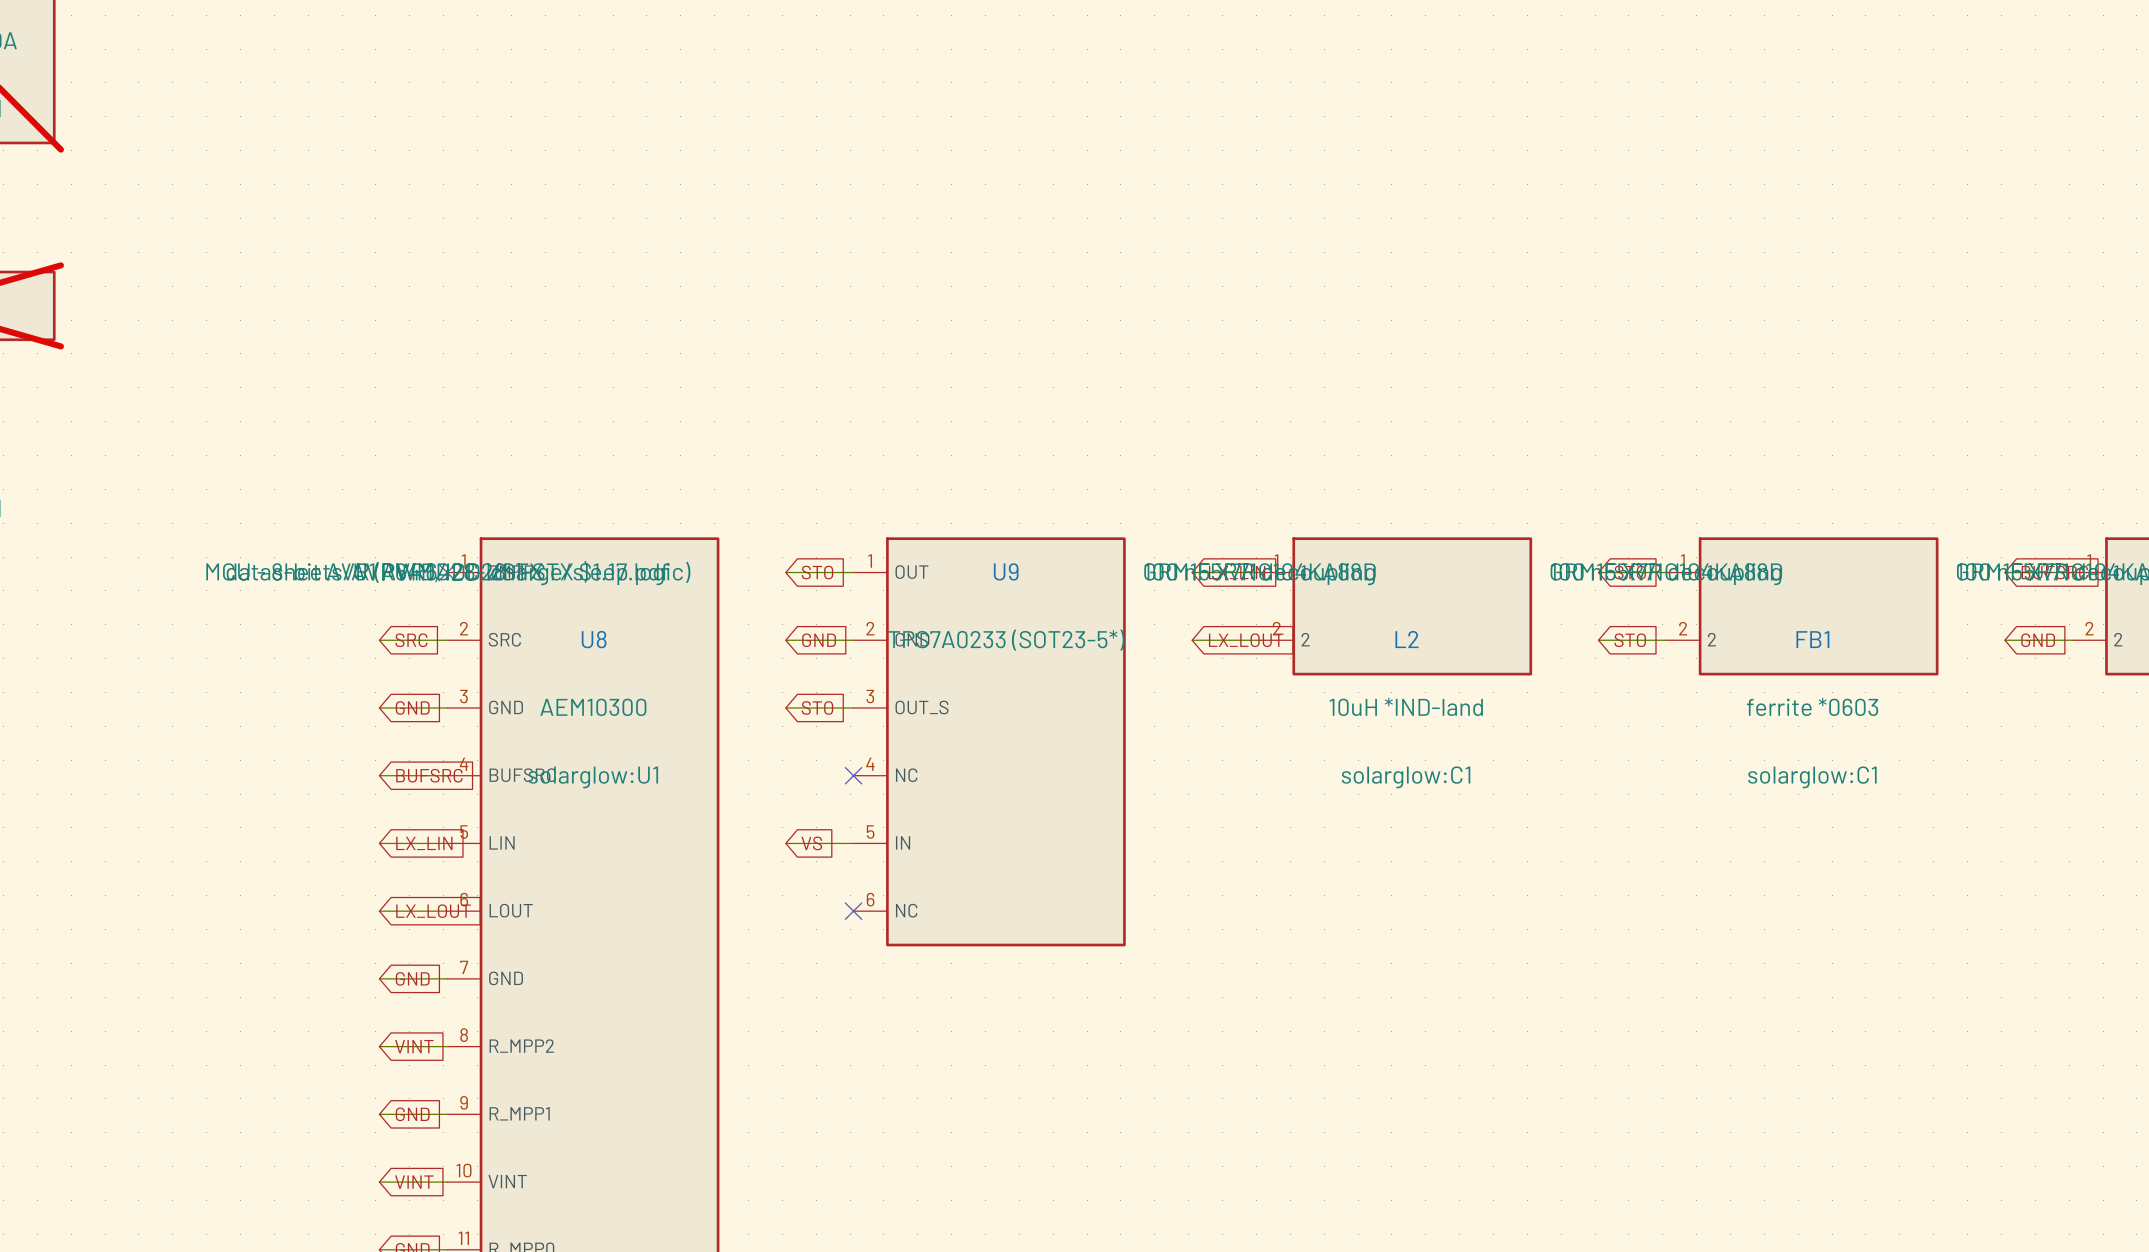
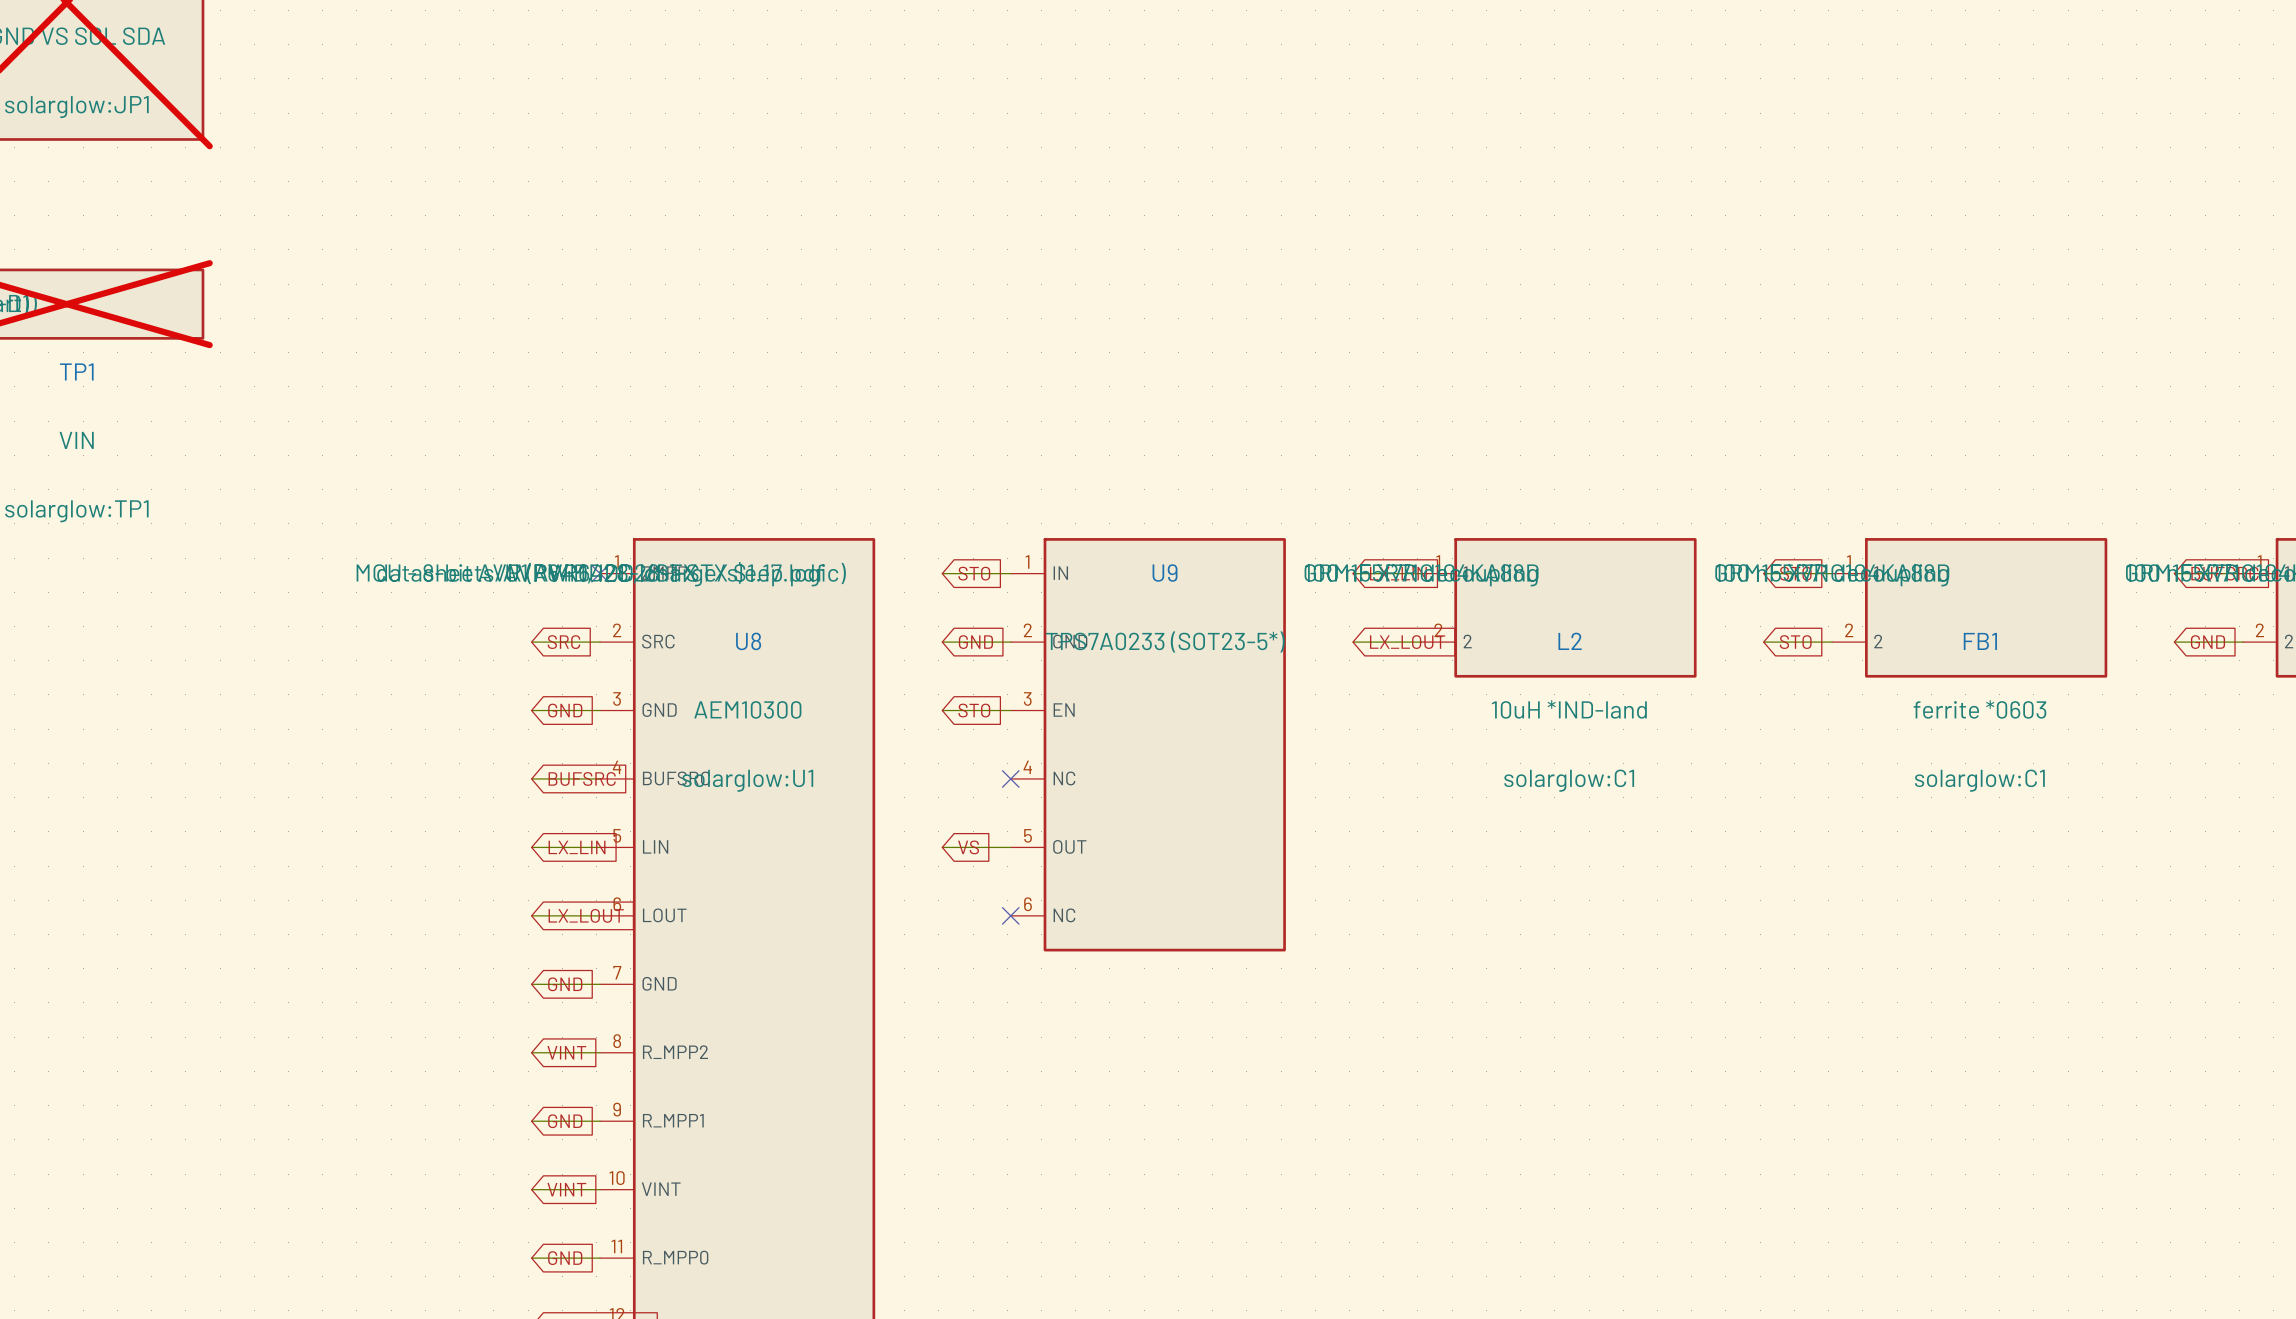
U9 pin name: OUT (911, 572) -> IN (1060, 573)
U9 pin name: OUT_S (922, 707) -> EN (1064, 710)
U9 pin name: IN (903, 842) -> OUT (1069, 846)

